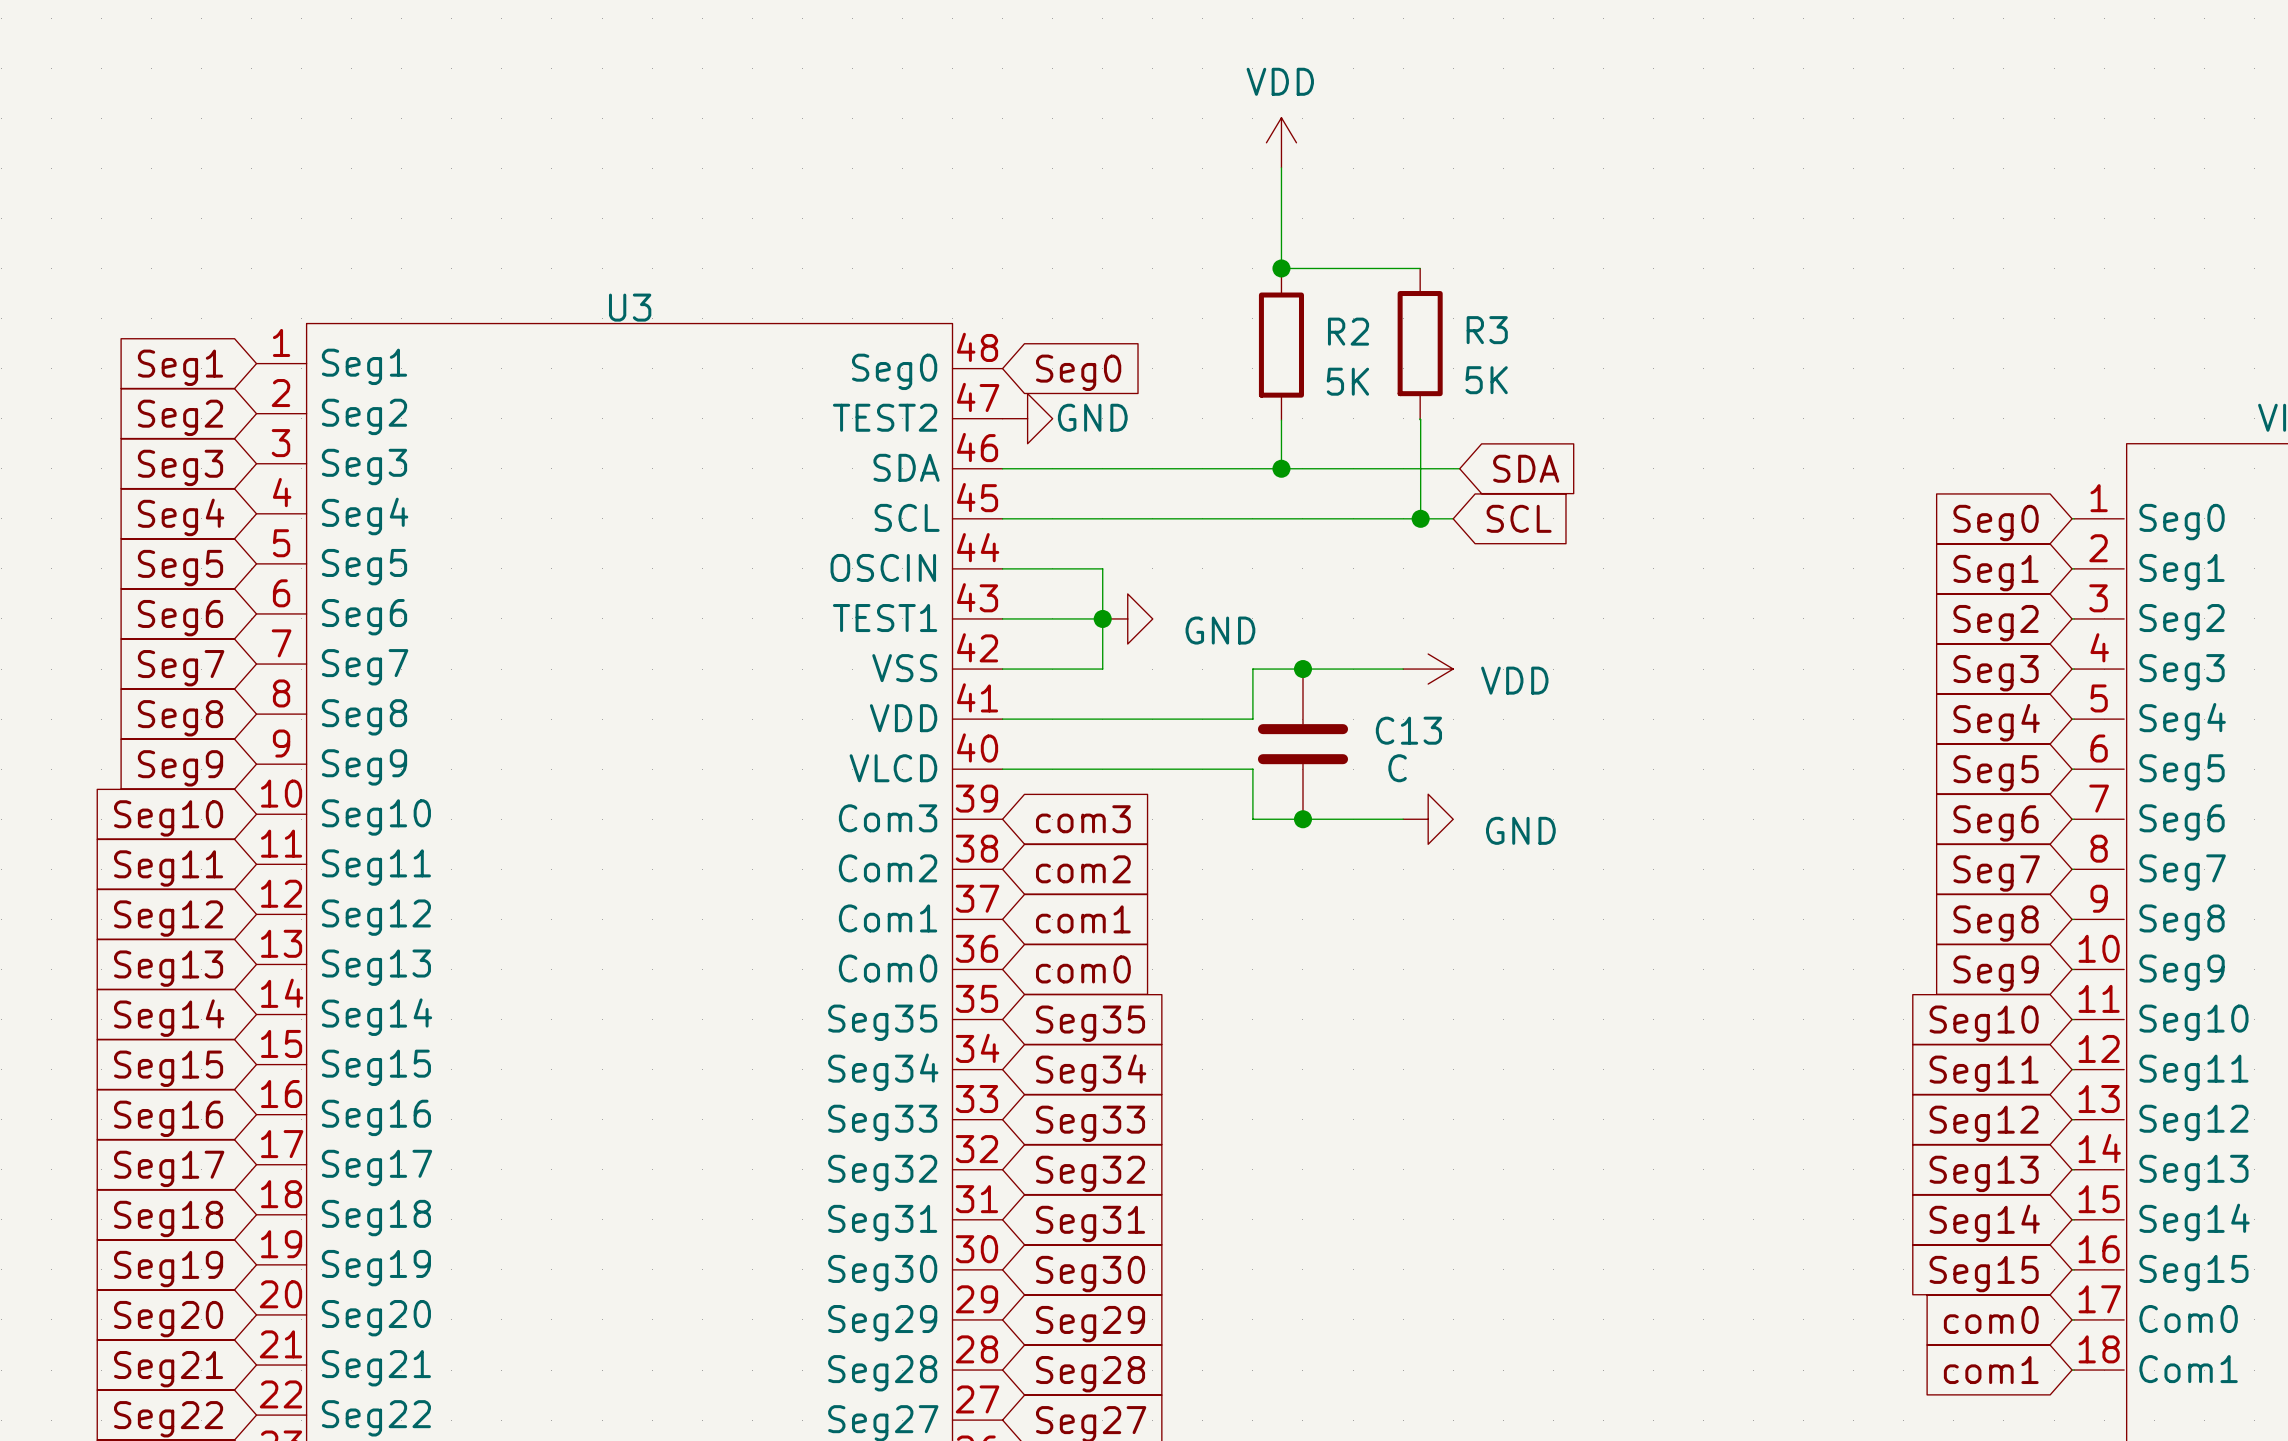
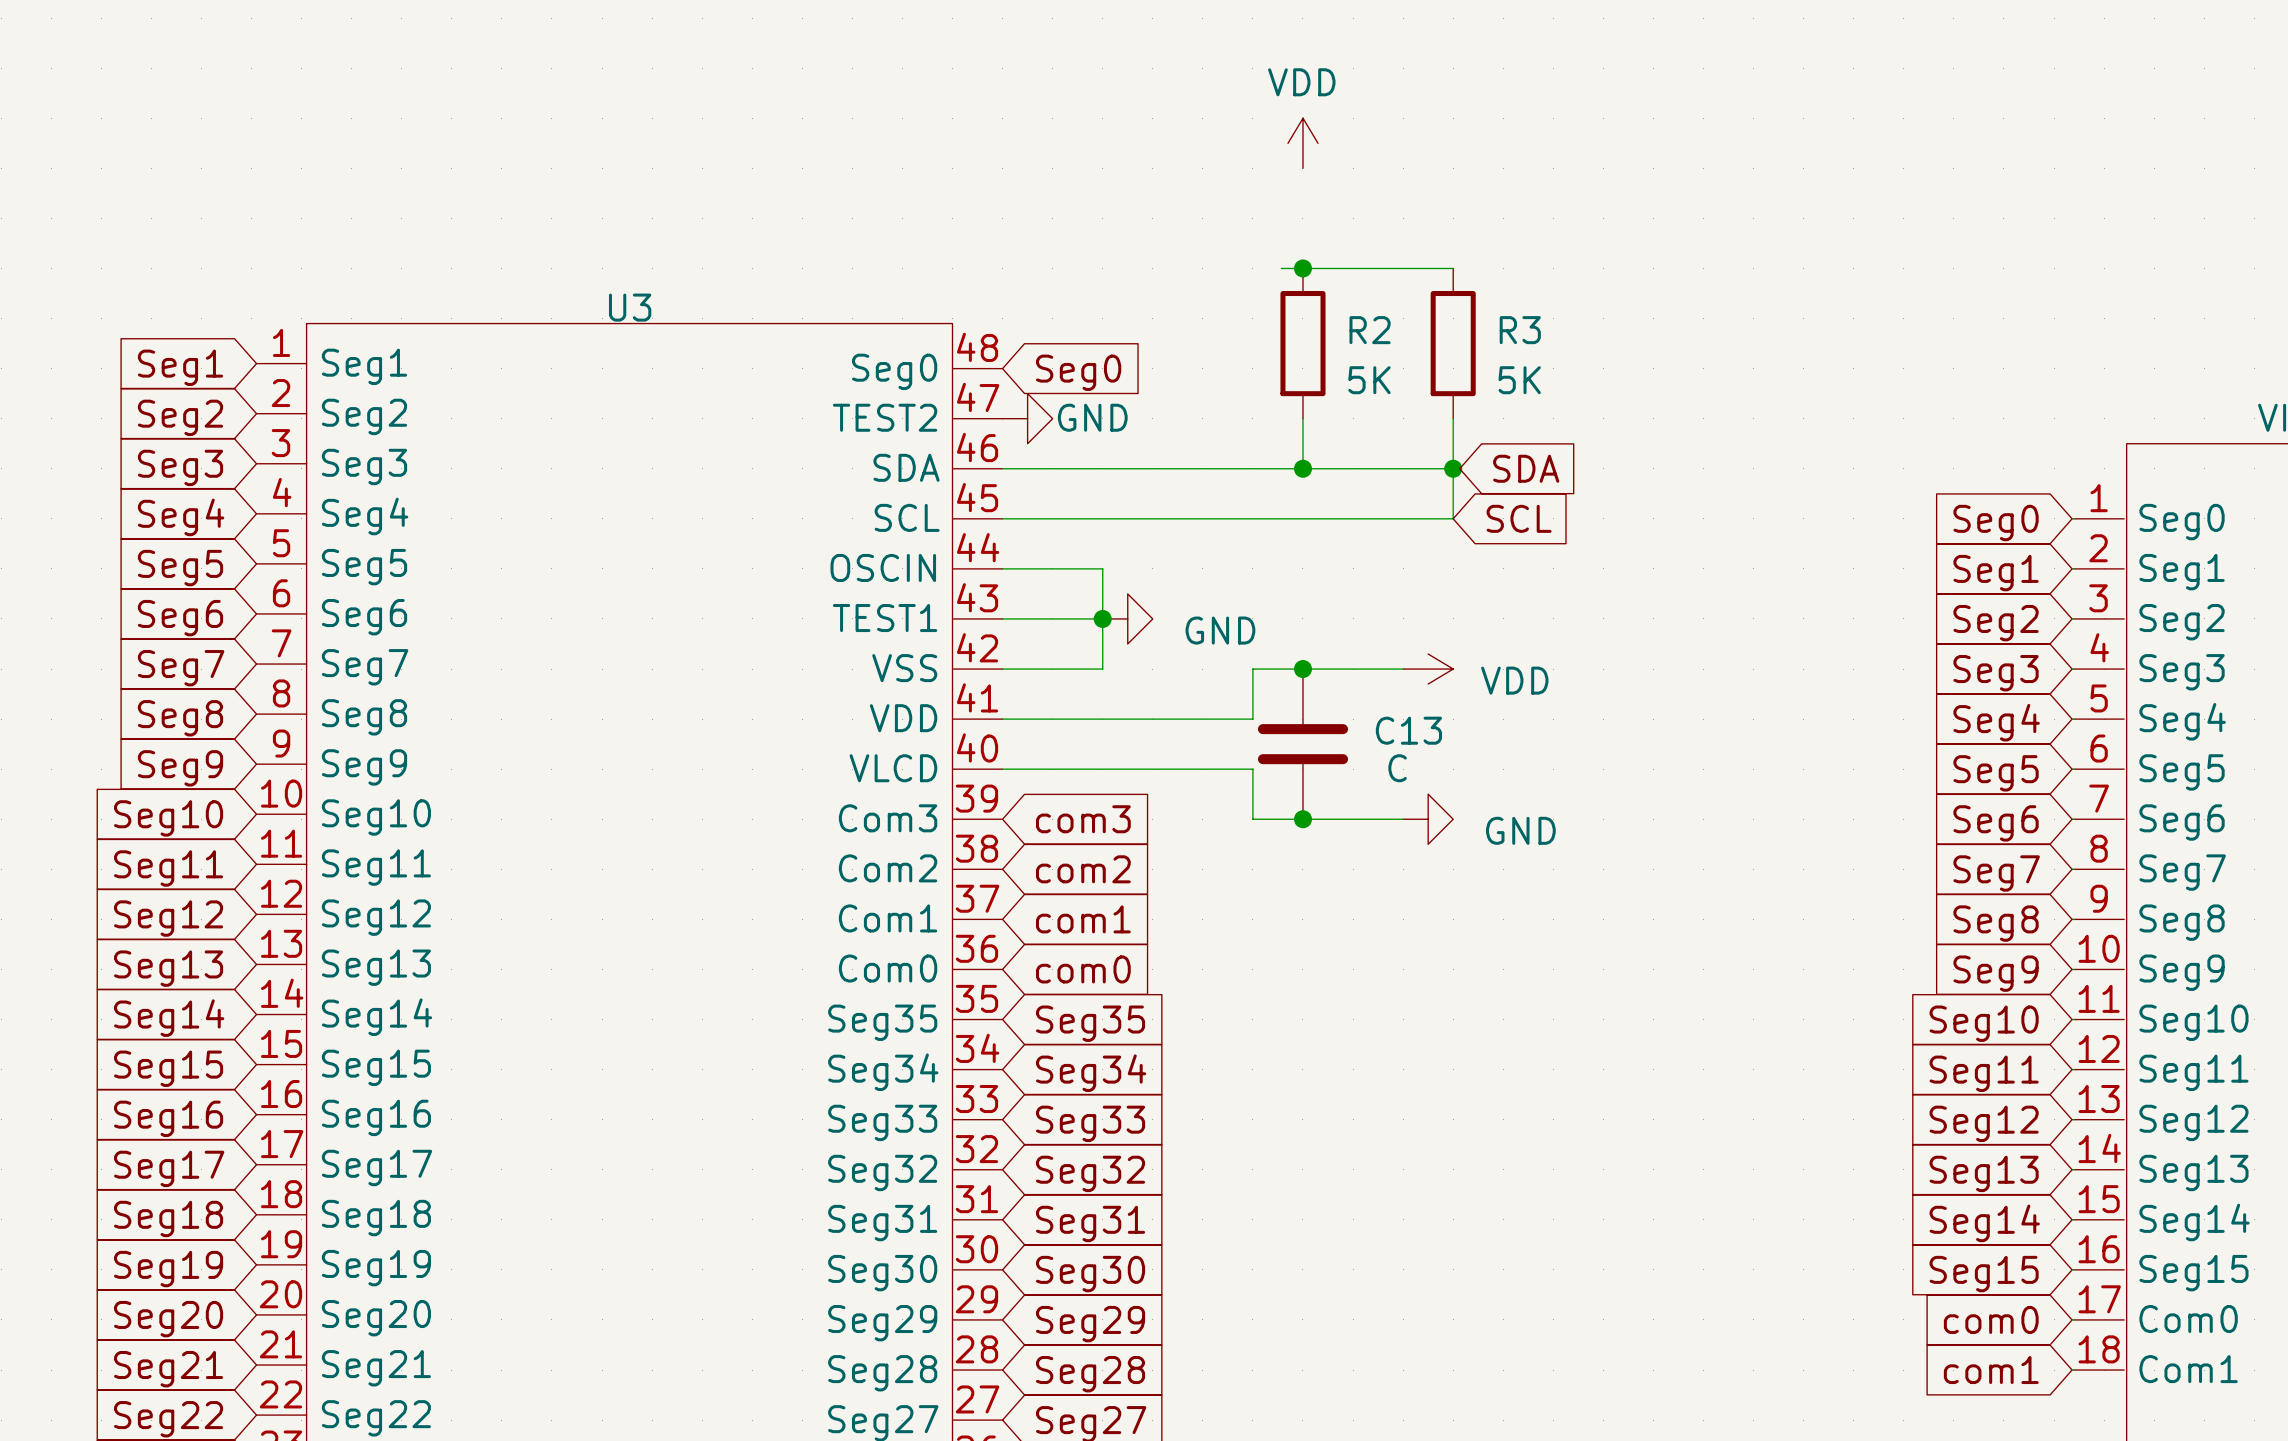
power symbol position: VDD (1281, 142) -> VDD (1302, 143)
wire: (1281, 167) (1281, 269) -> none
junction position: (1281, 268) -> (1302, 268)
wire: none -> (1420, 268) (1453, 268)
R3 position: (1420, 343) -> (1453, 343)
R2 position: (1281, 345) -> (1302, 343)
wire: none -> (1302, 418) (1302, 468)
wire: (1420, 418) (1420, 518) -> none
wire: none -> (1453, 418) (1453, 518)
wire: (1281, 420) (1281, 468) -> none
junction position: (1281, 468) -> (1302, 468)
junction position: (1420, 518) -> (1453, 468)

